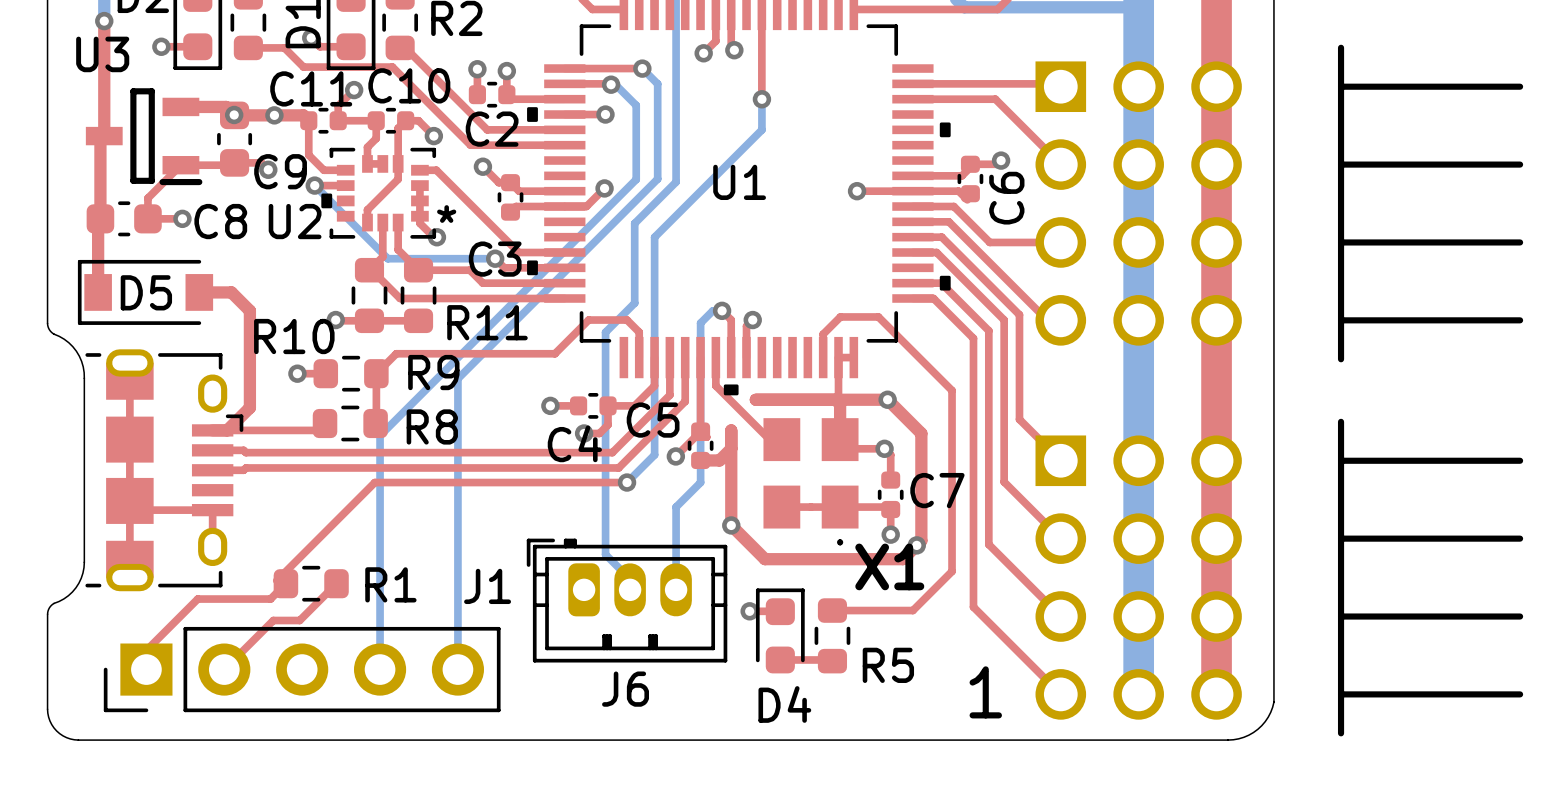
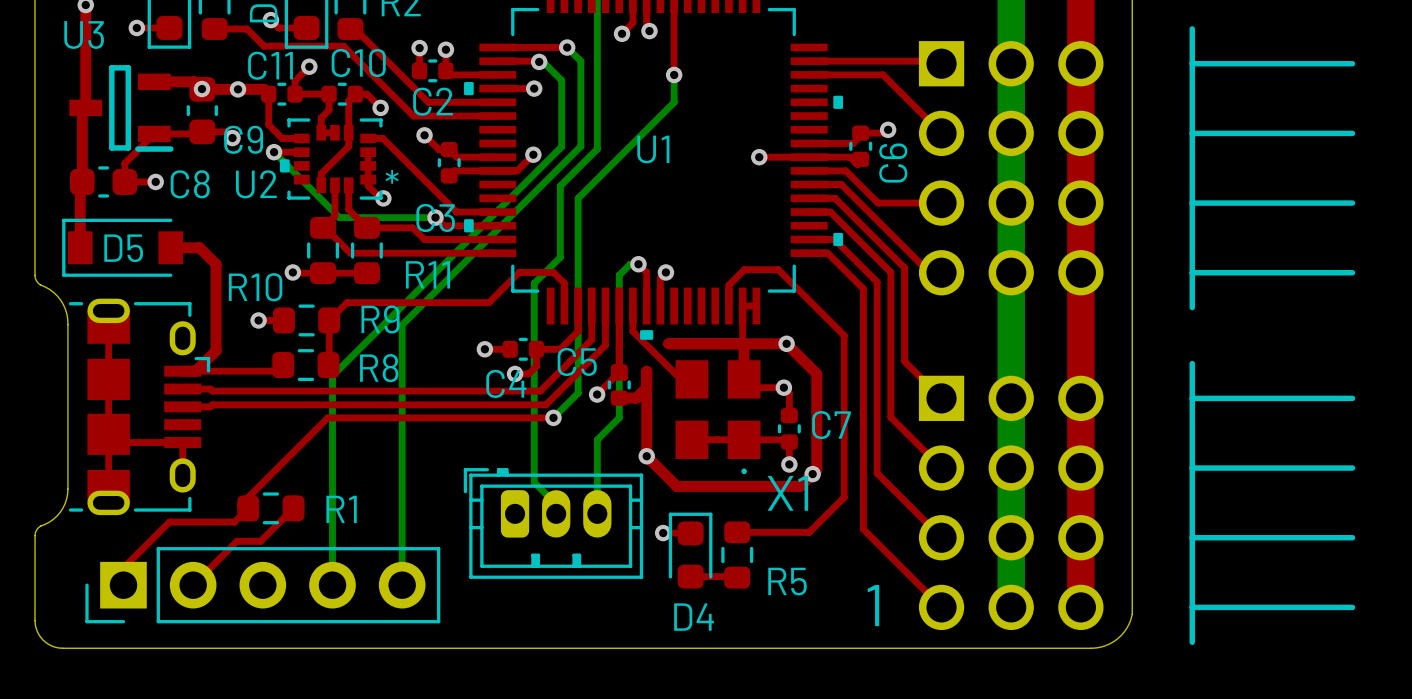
J1 name: J1 (487, 586) -> none
J6 name: J6 (625, 689) -> none

